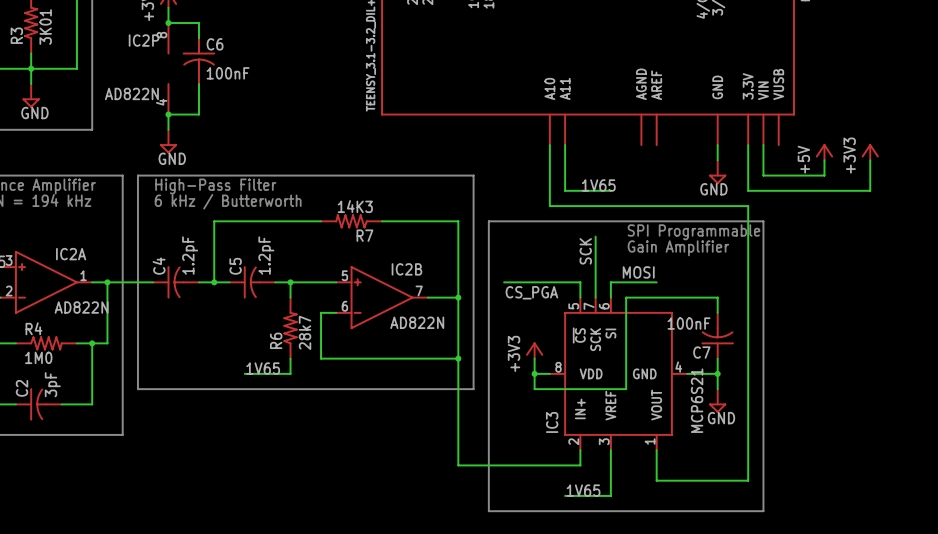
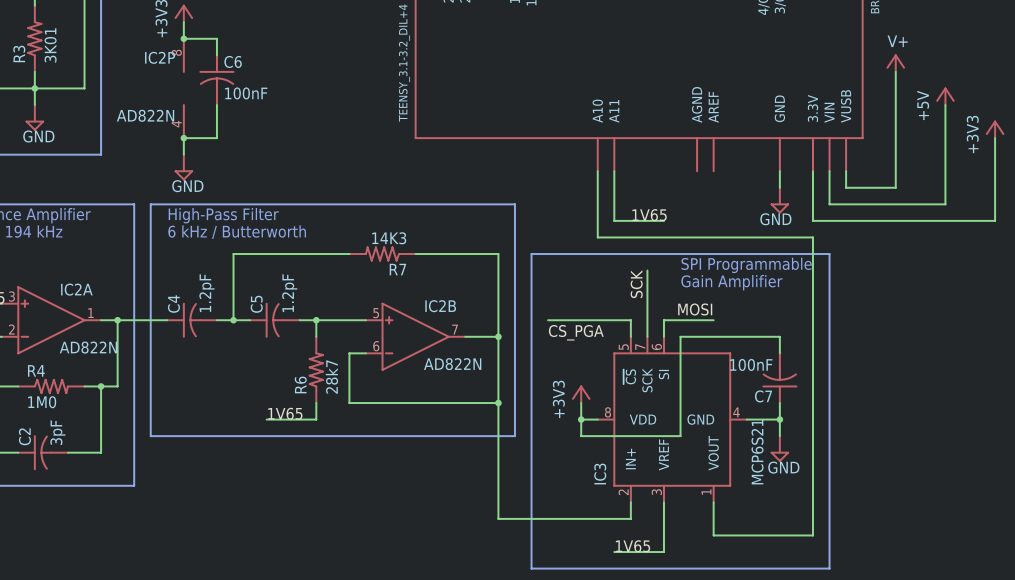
power symbol: none -> V+ (895, 63)
wire: none -> (895, 71) (895, 187) (846, 187) (846, 171)
wire: none -> (945, 105) (945, 187)
power symbol position: +5V (824, 152) -> +5V (945, 96)
power symbol position: +3V3 (870, 152) -> +3V3 (995, 129)
wire: (824, 160) (824, 175) -> (945, 204) (895, 204)
wire: (870, 175) (870, 190) -> (995, 138) (995, 220) (945, 220)

